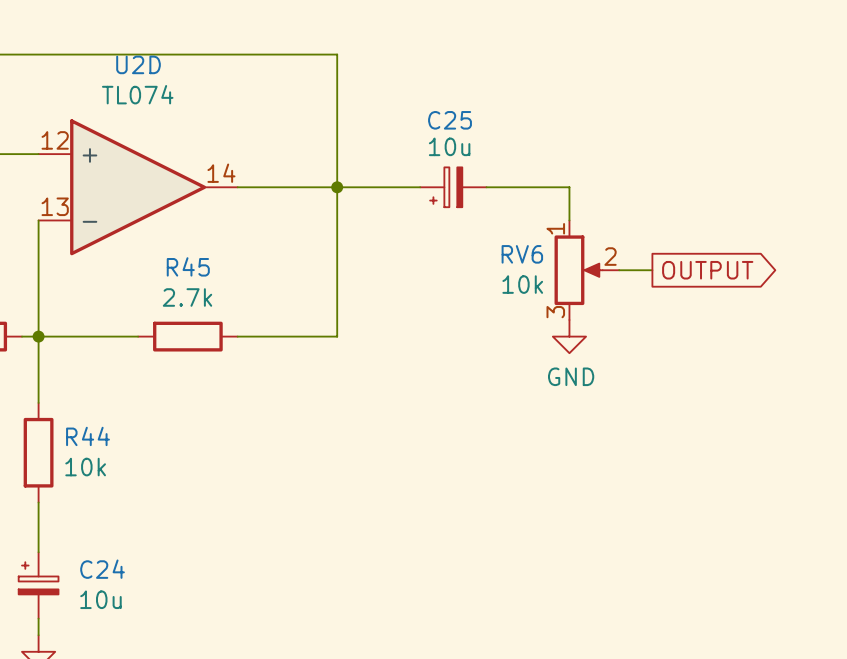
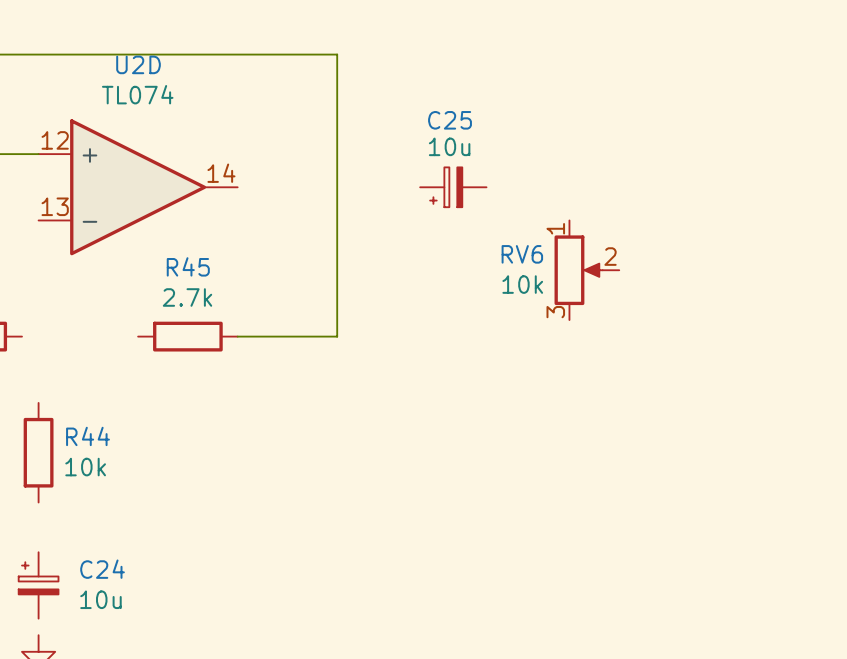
wire: (237, 187) (420, 187) -> none
junction: (337, 187) -> none
wire: (486, 187) (569, 187) (569, 220) -> none
wire: (38, 220) (38, 402) -> none
wire: (619, 270) (652, 270) -> none
global label: OUTPUT (707, 270) -> none
wire: (21, 336) (138, 336) -> none
junction: (38, 336) -> none
power symbol: GND (569, 336) -> none
wire: (38, 502) (38, 552) -> none
wire: (38, 618) (38, 635) -> none

